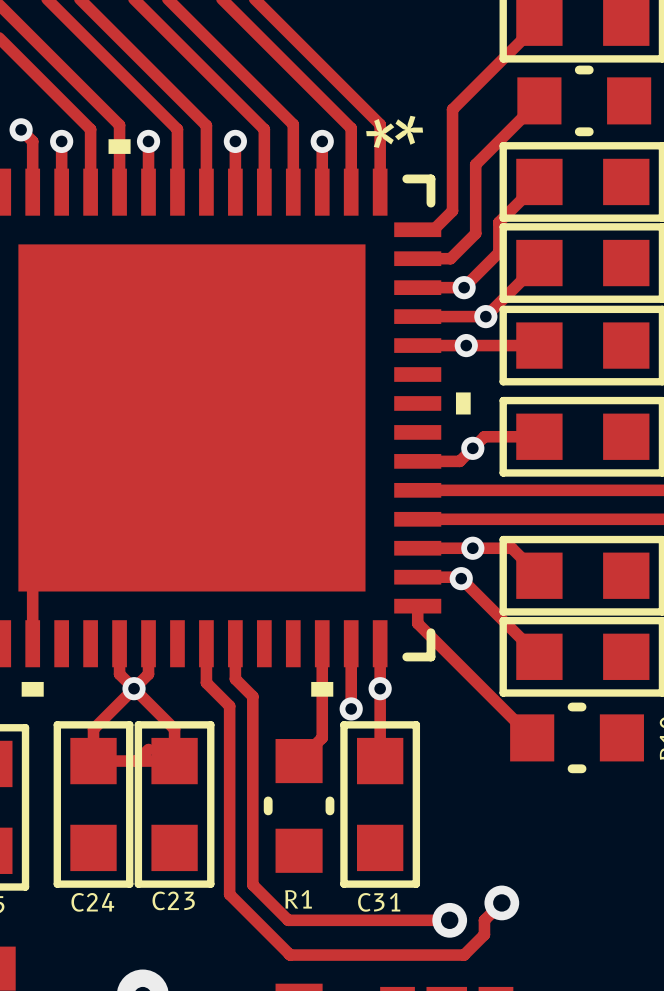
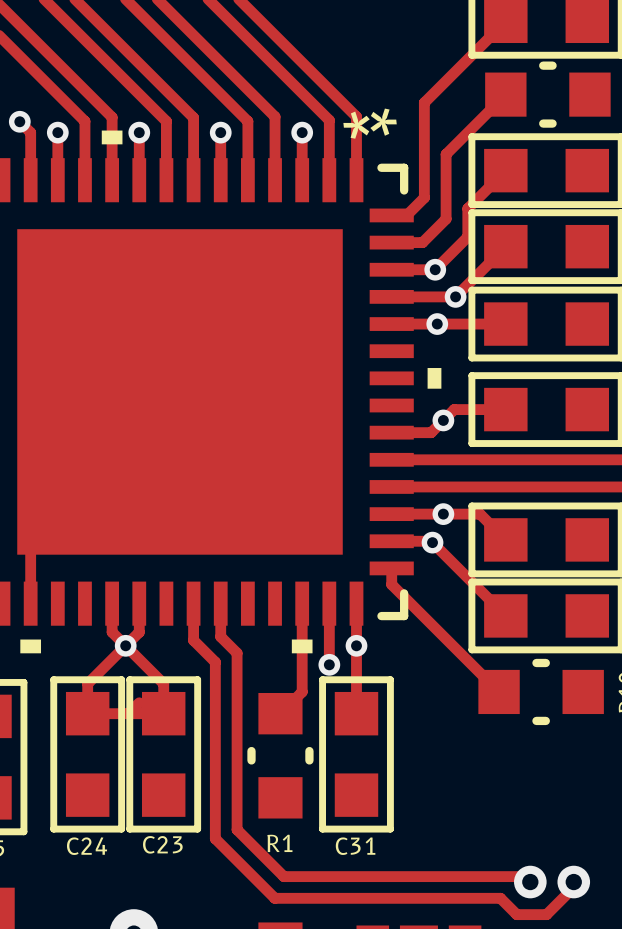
track: (501, 902) (484, 920) (484, 934) (464, 955) (290, 955) -> (573, 882) (573, 887) (546, 914) (516, 914) (500, 898) (274, 898) (272, 895)
via: (501, 902) -> none
track: (288, 920) (449, 920) -> (270, 863) (283, 876) (524, 876) (530, 882)
via: (449, 920) -> none
via: none -> (530, 882)
via: none -> (573, 882)

